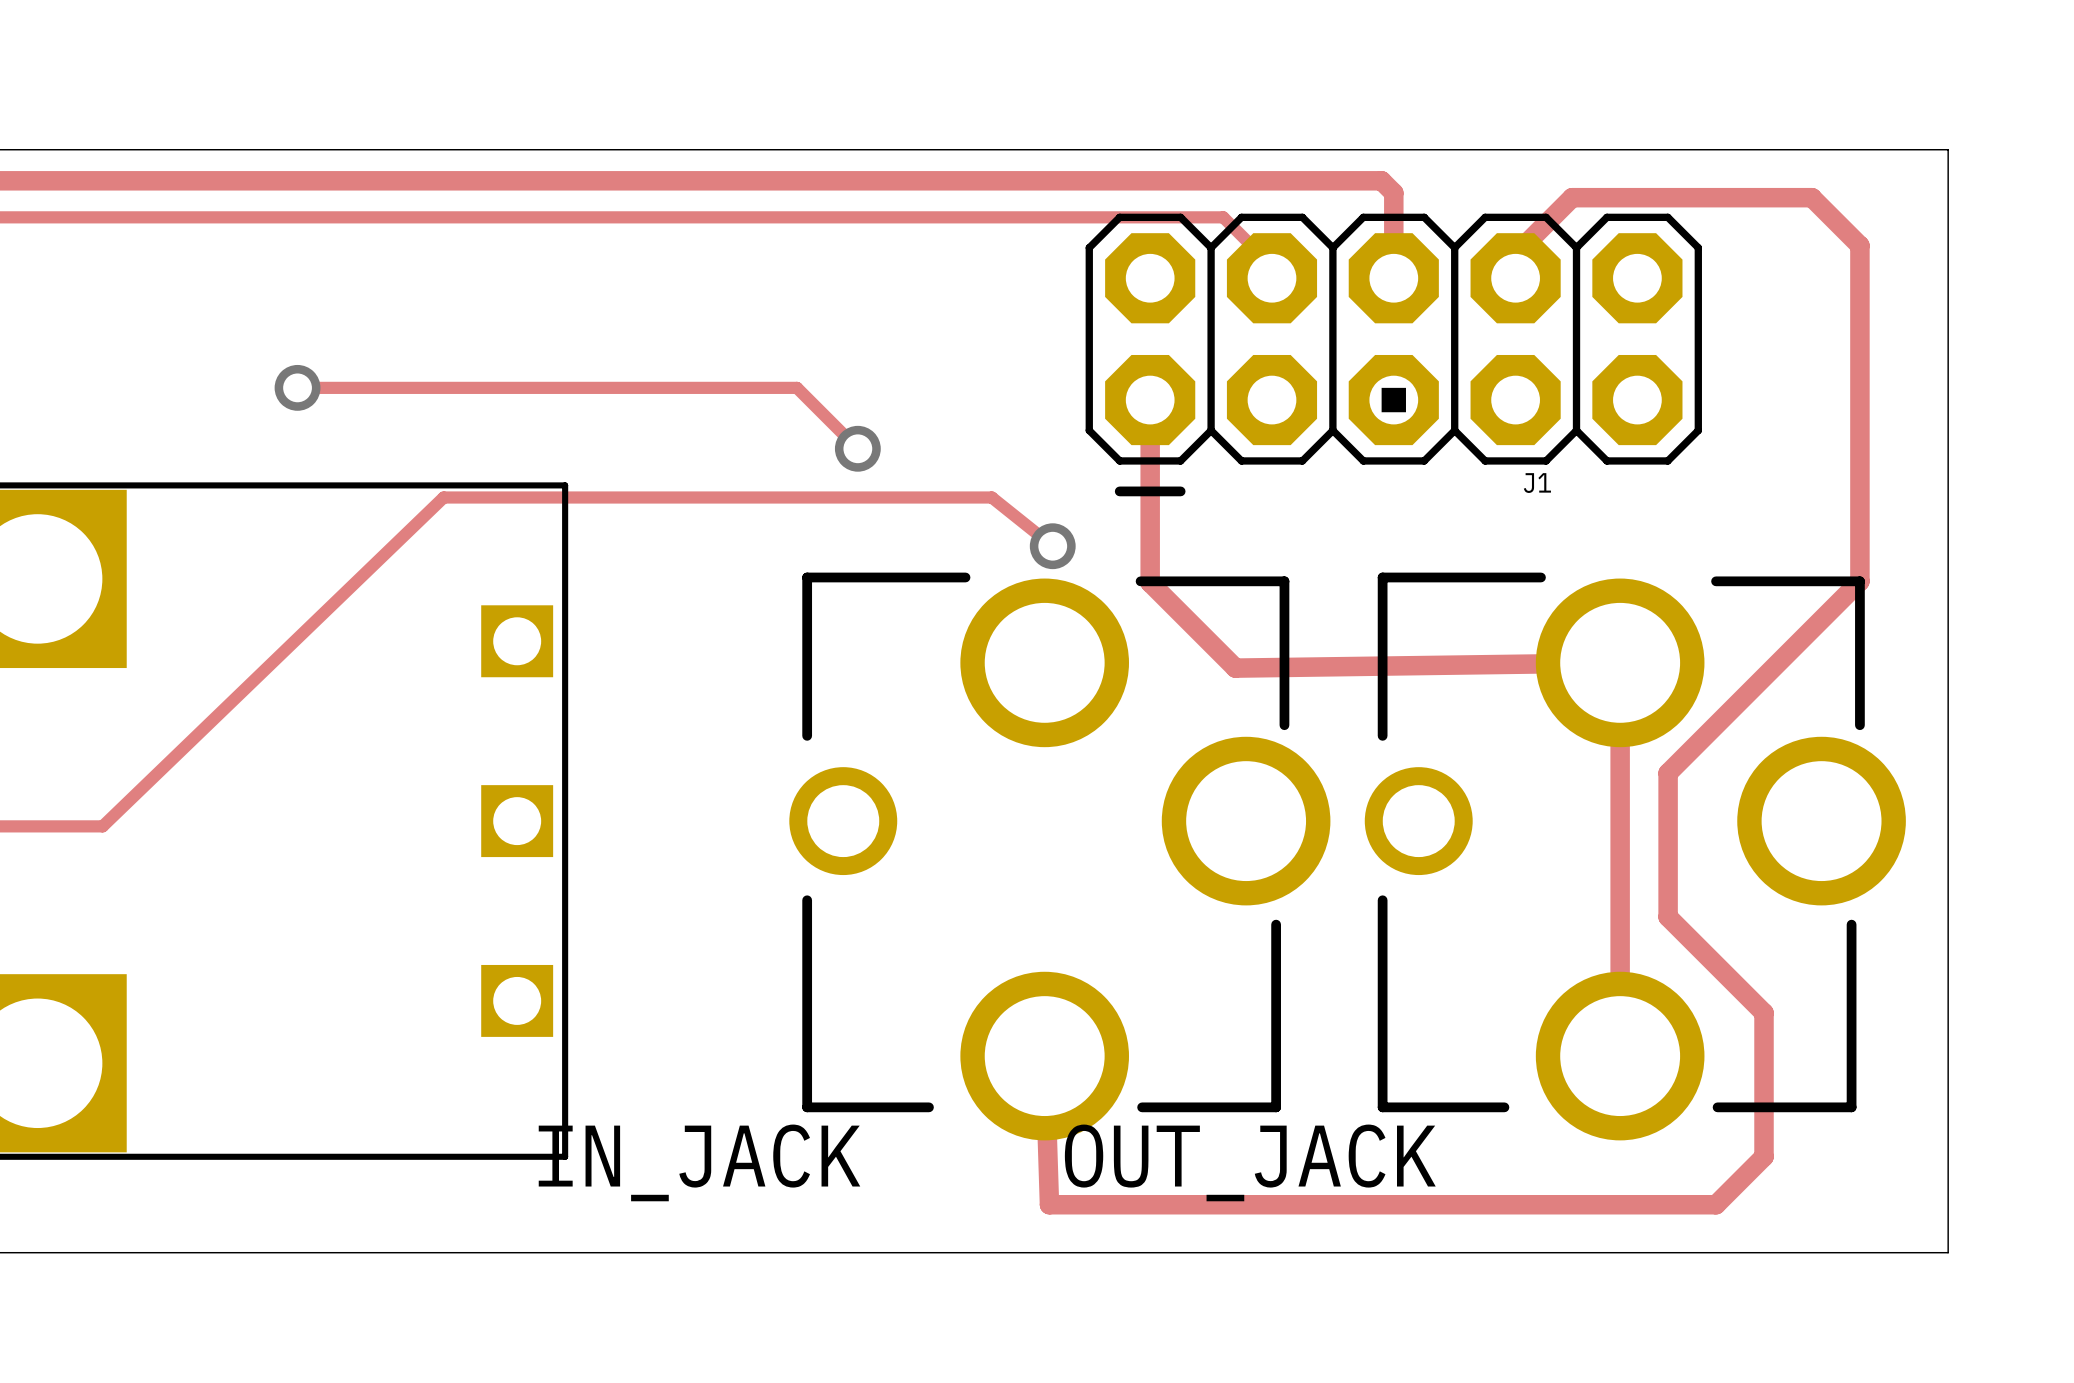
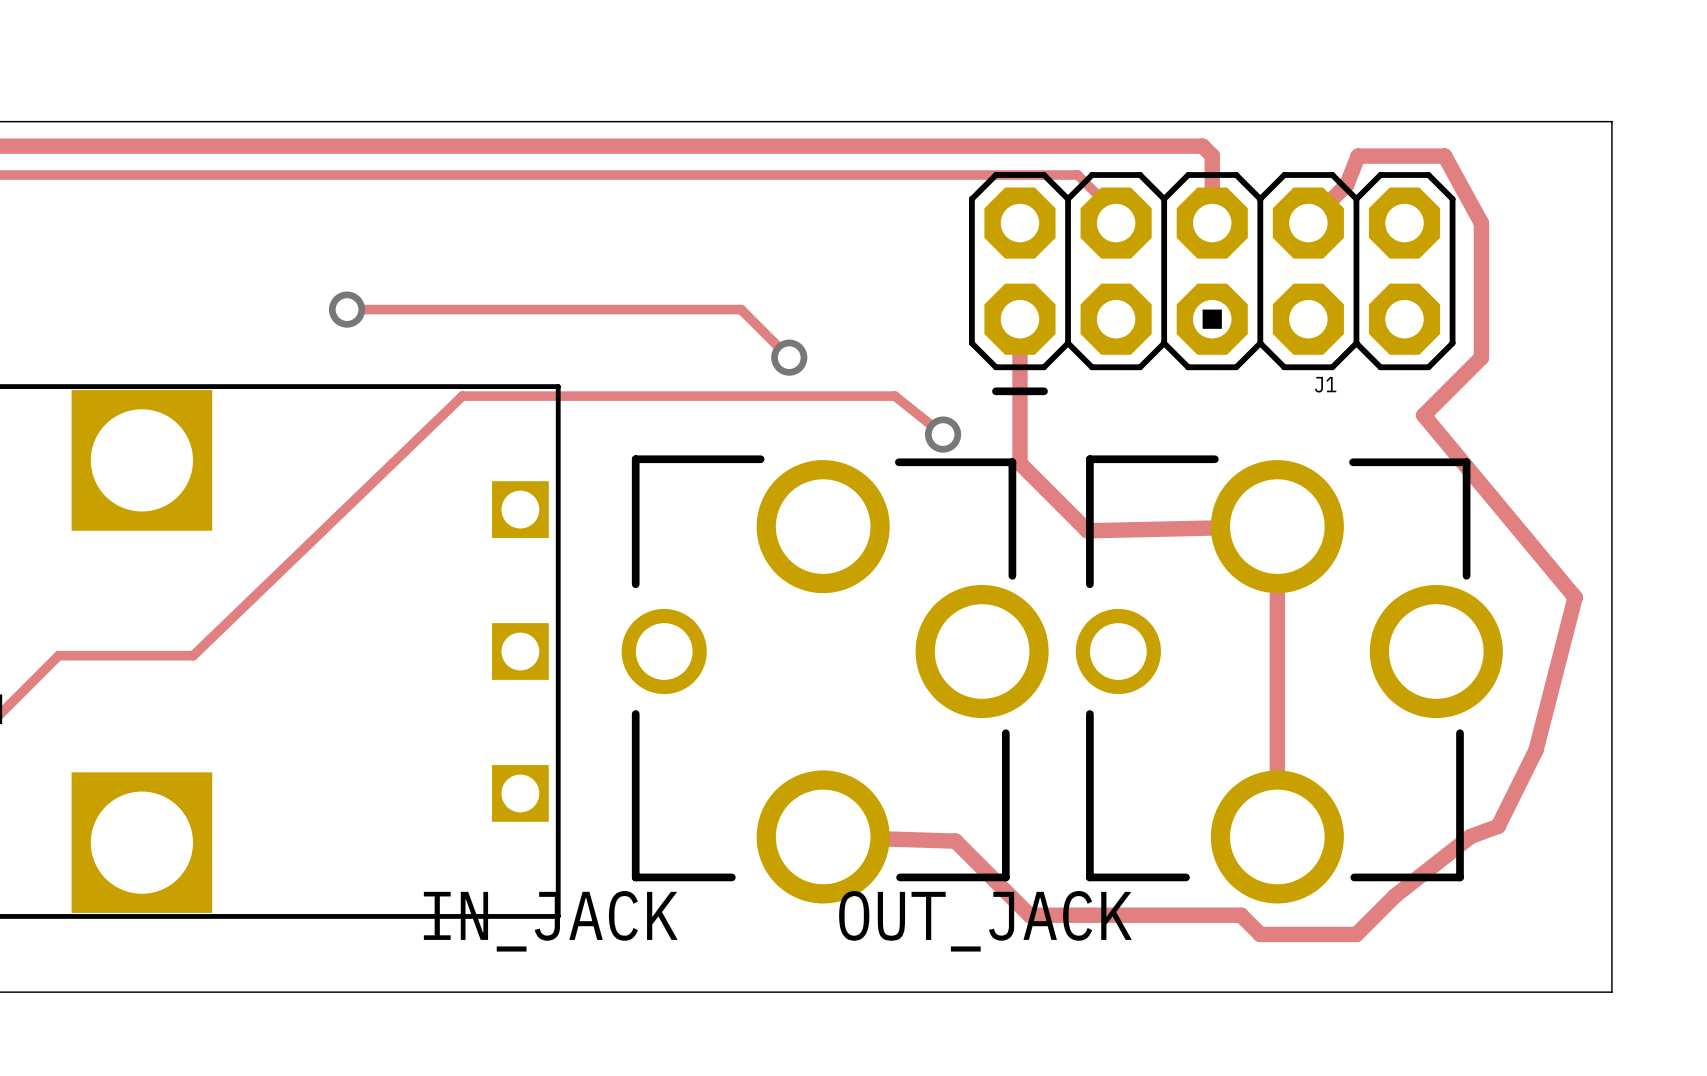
board edge: (1900, 149) (1948, 149) (1948, 1252) (1900, 1252) -> (1611, 121) (1611, 992)
track: (1515, 278) (1515, 254) (1572, 197) (1811, 197) (1859, 245) (1859, 581) (1668, 773) (1668, 917) (1764, 1012) (1764, 1156) (1716, 1204) (1049, 1204) (1044, 1056) -> (1308, 223) (1346, 184) (1358, 156) (1444, 156) (1481, 223) (1481, 357) (1423, 415) (1575, 597) (1536, 749) (1498, 826) (1470, 836) (1394, 896) (1356, 934) (1260, 934) (1241, 915) (1029, 915) (955, 841) (823, 836)
track: (1235, 668) (1620, 662) (1620, 1056) -> (1087, 530) (1277, 526) (1277, 836)
IN_JACK position: (1059, 856) -> (835, 679)
OUT_JACK position: (1635, 856) -> (1289, 679)

